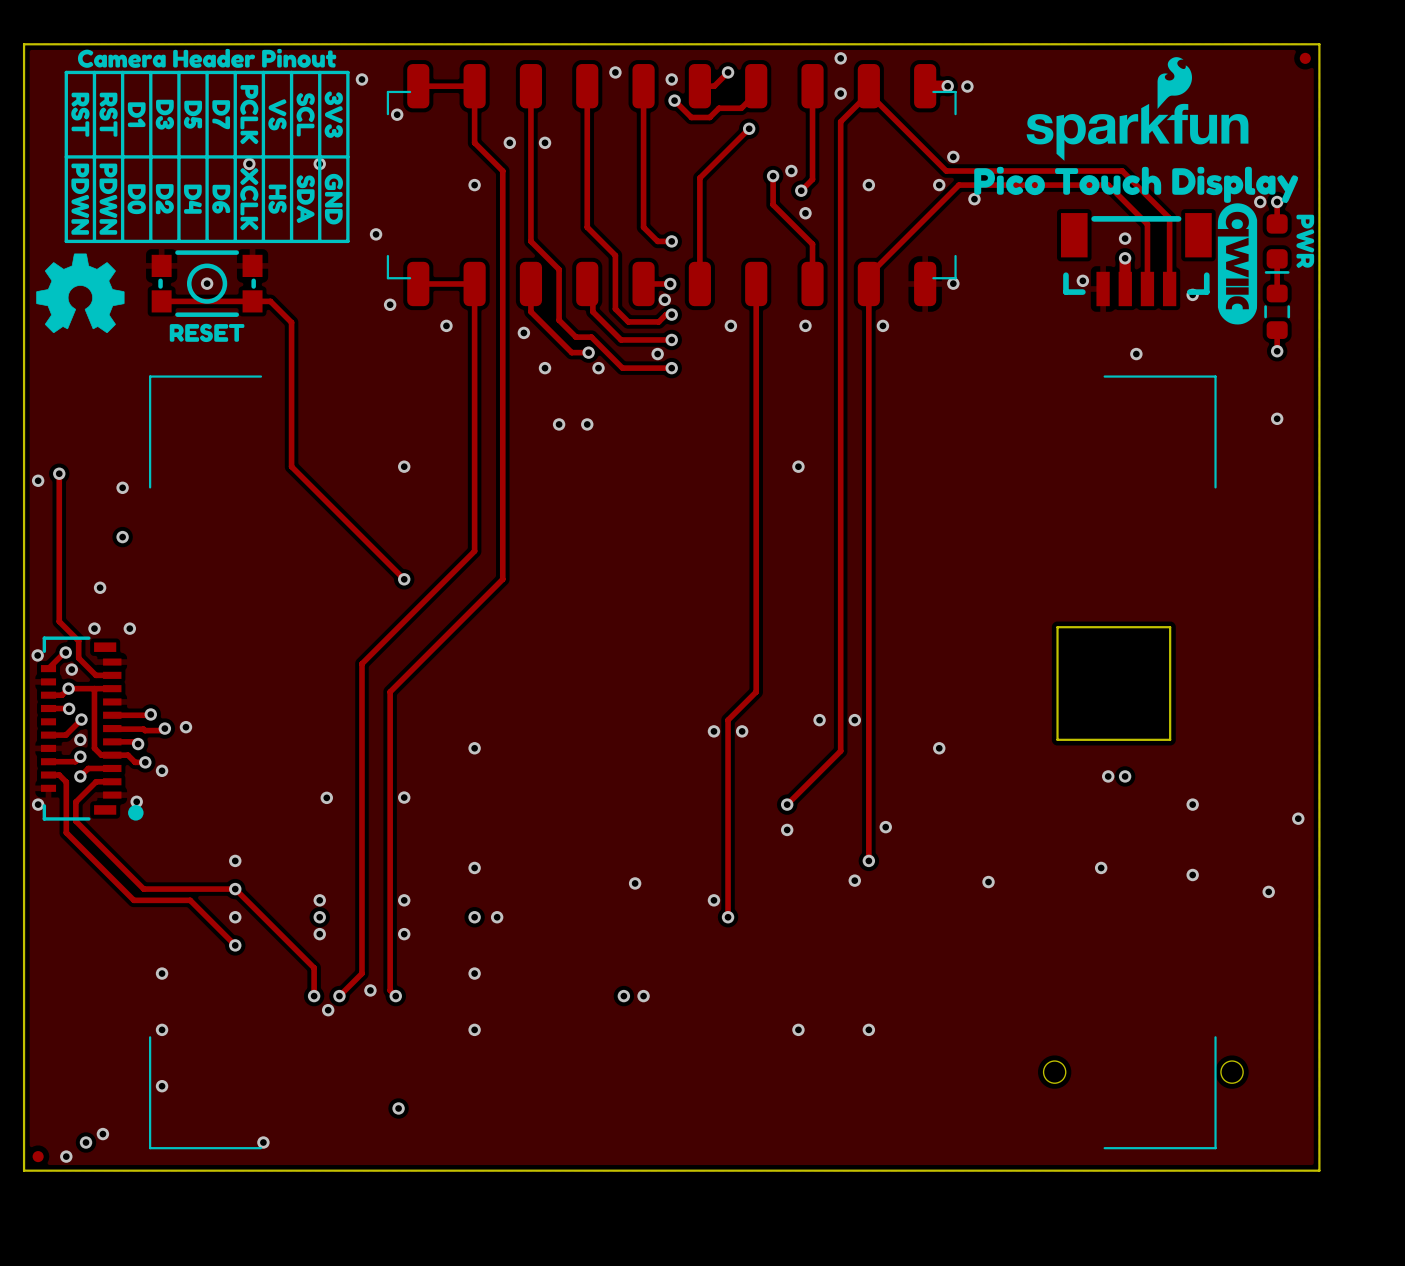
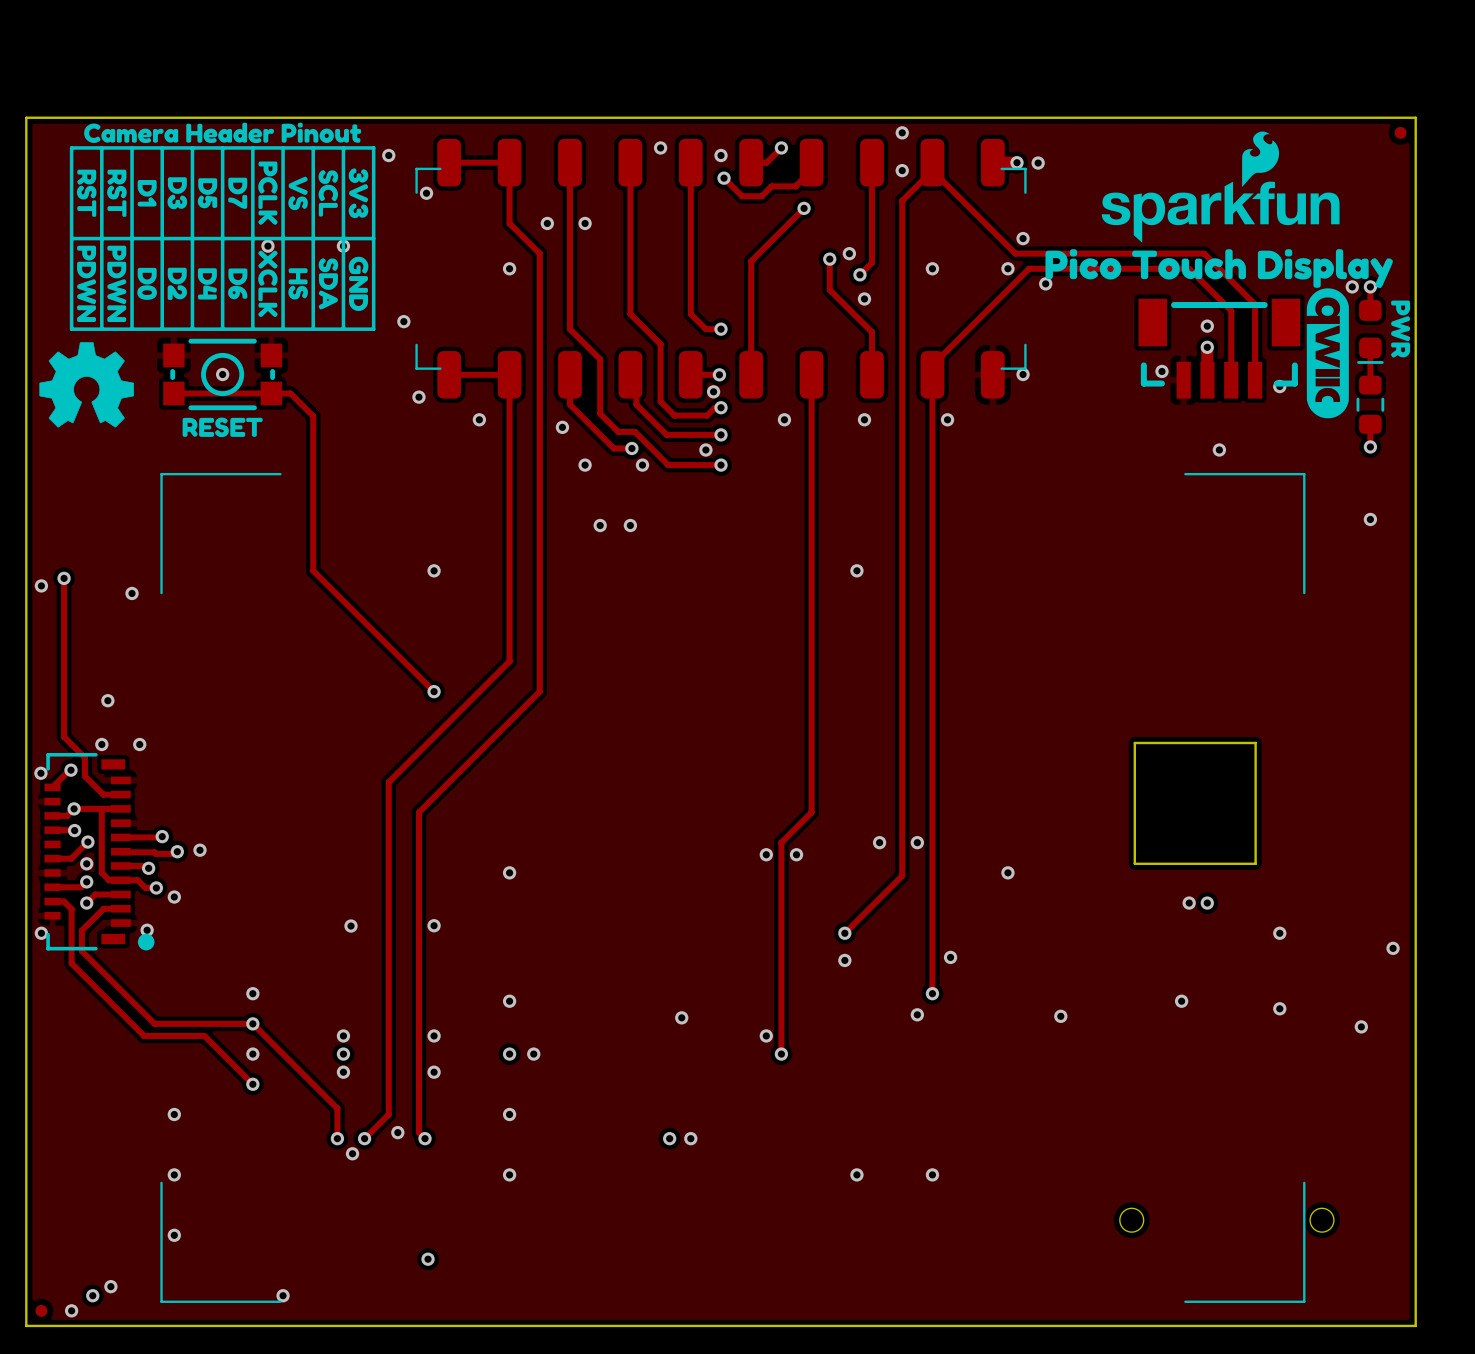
via: (122, 537) -> none
via: (71, 669) -> none

